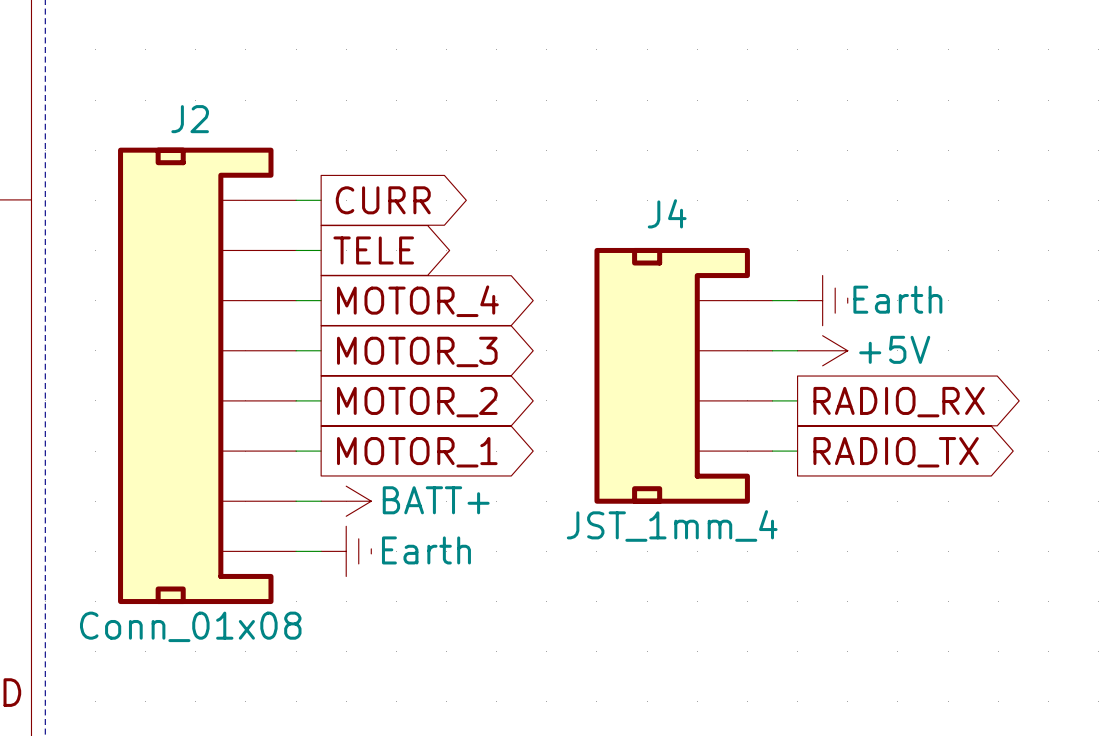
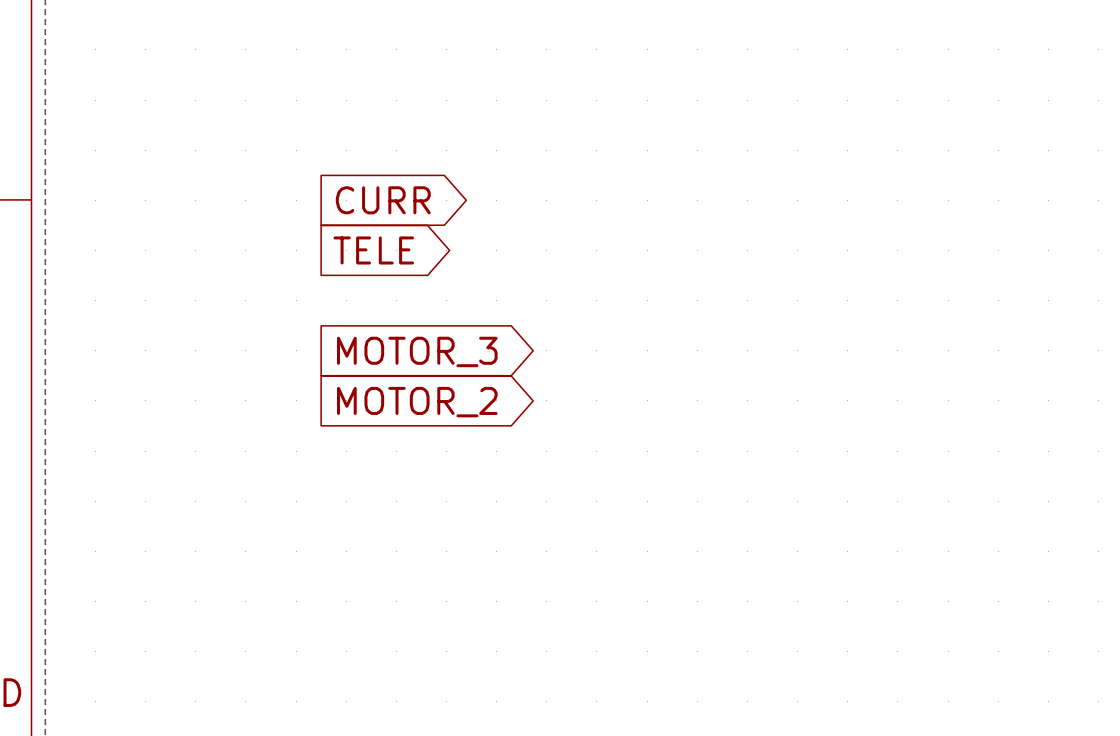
wire: (296, 200) (321, 200) -> none
wire: (296, 250) (321, 250) -> none
wire: (296, 300) (321, 300) -> none
wire: (772, 300) (797, 300) -> none
power symbol: Earth (822, 300) -> none
global label: MOTOR_4 (417, 301) -> none
wire: (296, 350) (321, 350) -> none
wire: (772, 350) (797, 350) -> none
power symbol: +5V (822, 350) -> none
J2: Conn_01x08 (207, 375) -> none
J4: JST_1mm_4 (683, 375) -> none
wire: (296, 400) (321, 400) -> none
wire: (772, 400) (797, 400) -> none
global label: RADIO_RX (899, 402) -> none
wire: (296, 451) (321, 451) -> none
wire: (772, 451) (797, 451) -> none
global label: MOTOR_1 (417, 452) -> none
global label: RADIO_TX (896, 452) -> none
wire: (296, 501) (321, 501) -> none
power symbol: BATT+ (346, 501) -> none
wire: (296, 551) (321, 551) -> none
power symbol: Earth (346, 551) -> none

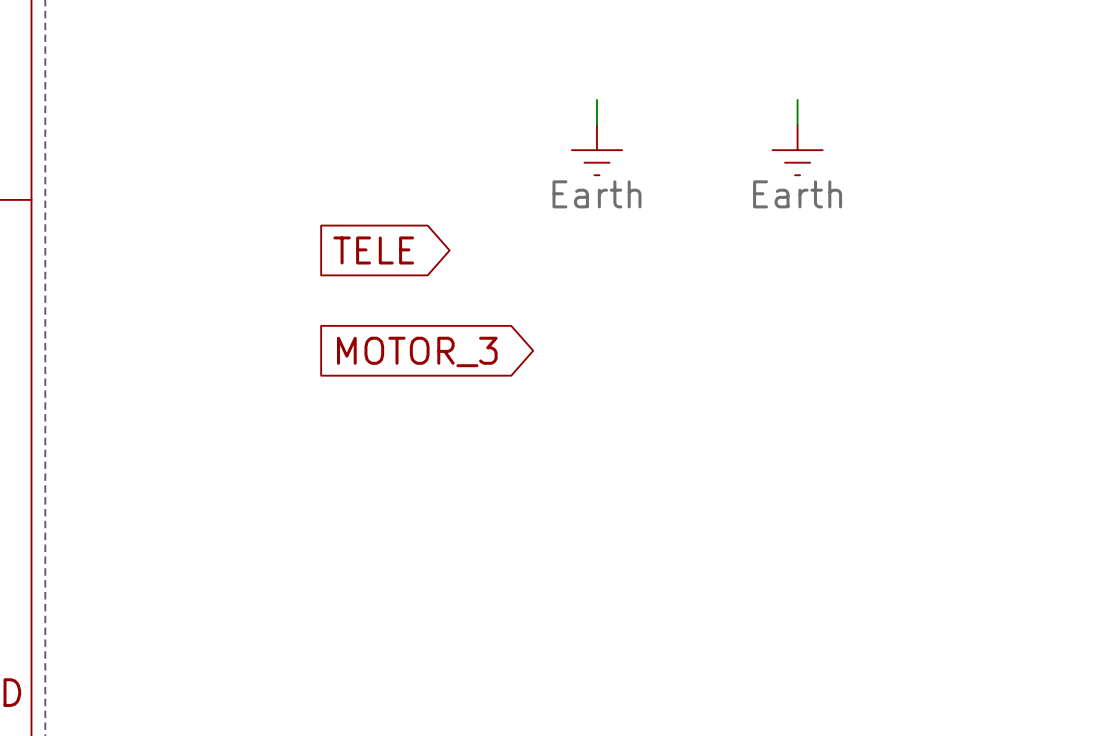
wire: none -> (596, 100) (596, 125)
wire: none -> (797, 100) (797, 125)
power symbol: none -> Earth (596, 150)
power symbol: none -> Earth (797, 150)
global label: CURR (383, 200) -> none
global label: MOTOR_2 (417, 402) -> none

